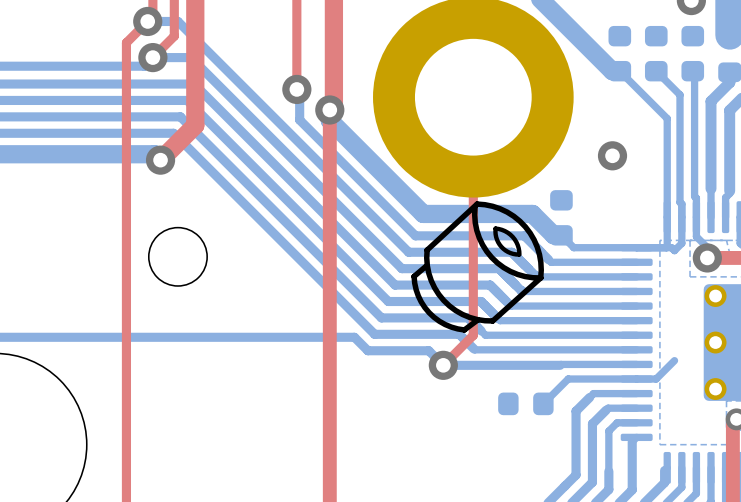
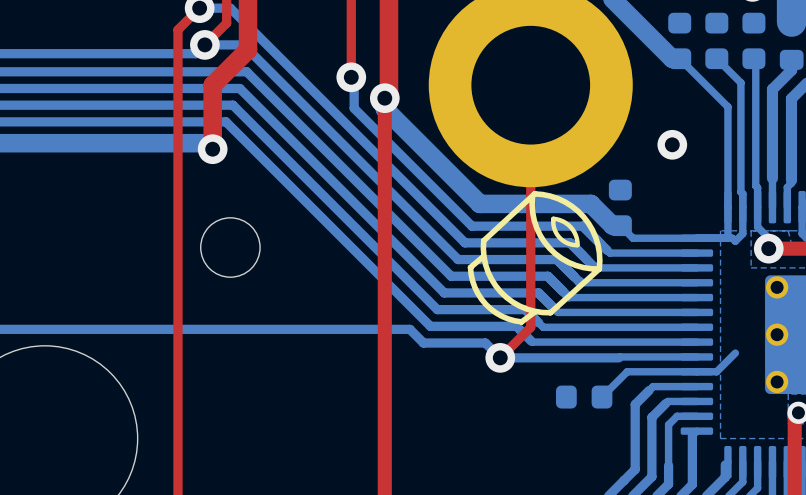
top track: (195, 62) (195, 125) (160, 160) -> (248, 49) (212, 85) (212, 149)

